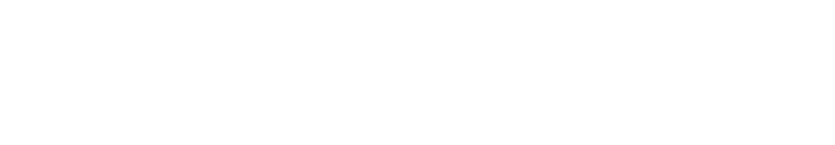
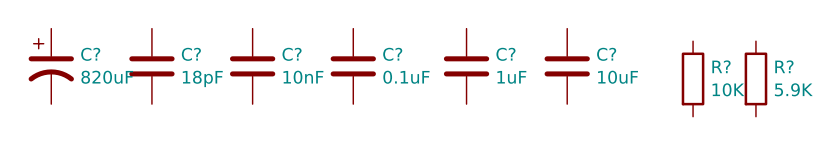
C?: none -> 820uF (51, 66)
C?: none -> 18pF (151, 66)
C?: none -> 10nF (252, 66)
C?: none -> 0.1uF (353, 66)
C?: none -> 1uF (466, 66)
C?: none -> 10uF (567, 66)
R?: none -> 10K (693, 78)
R?: none -> 5.9K (755, 78)

